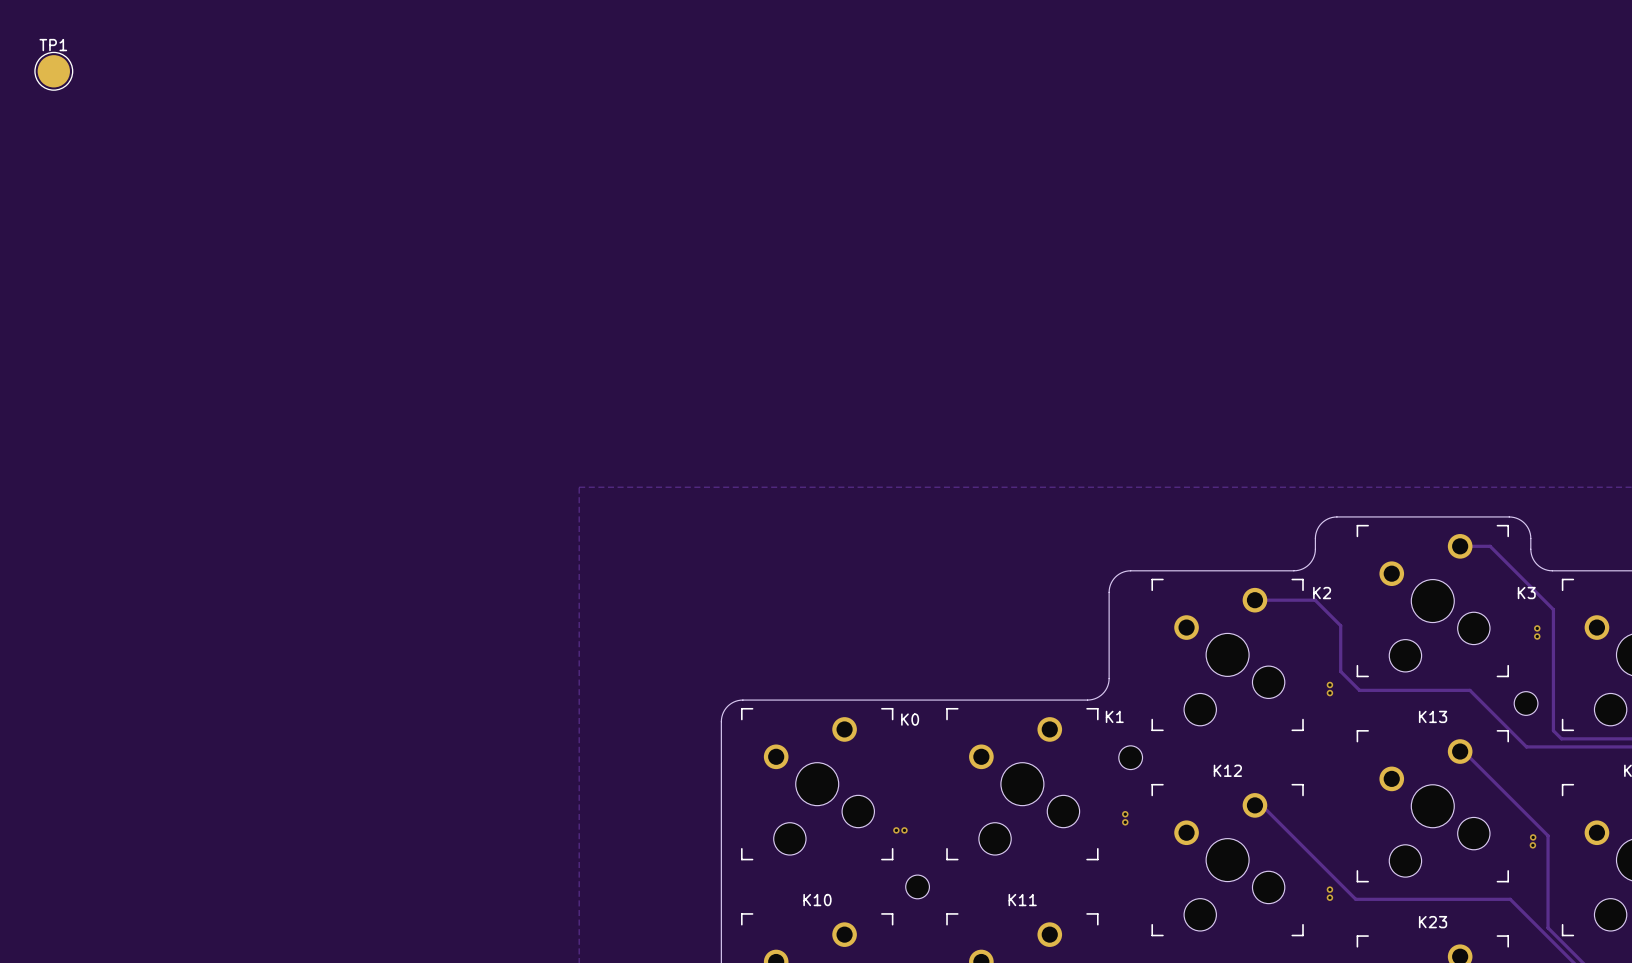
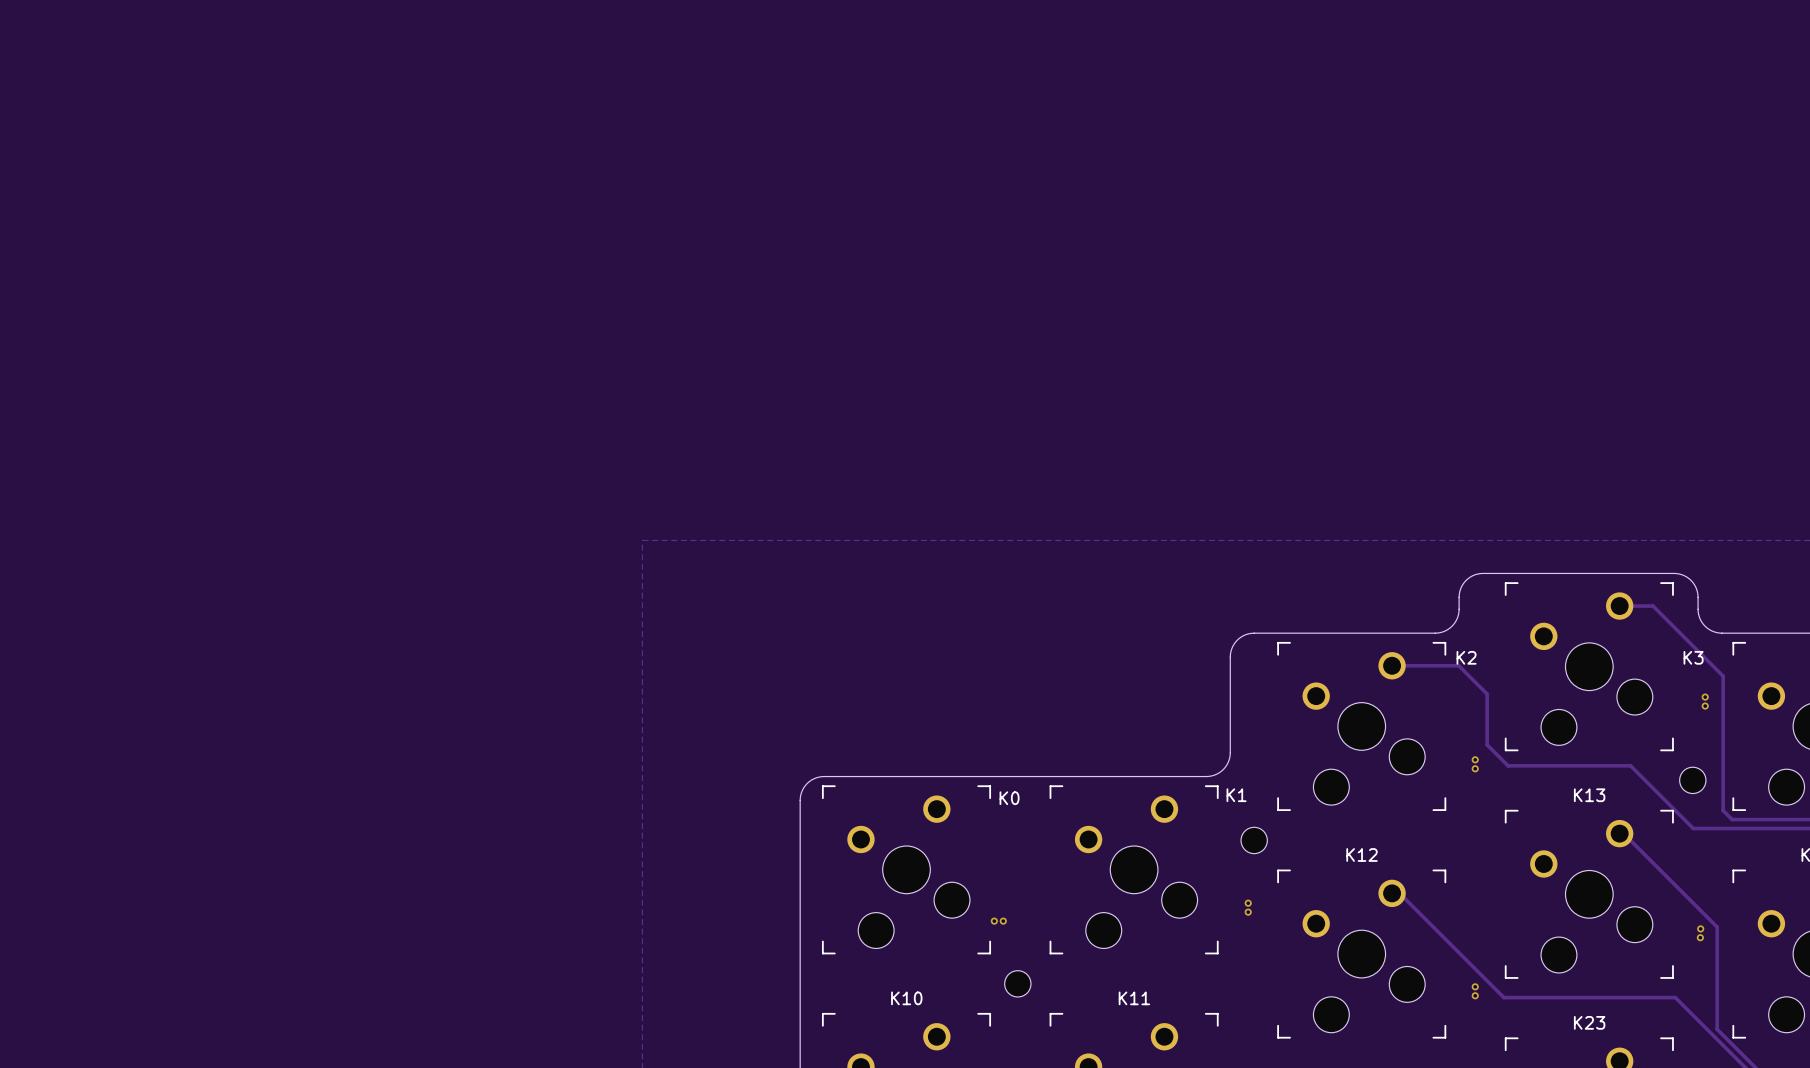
TP1: (53, 71) -> none

